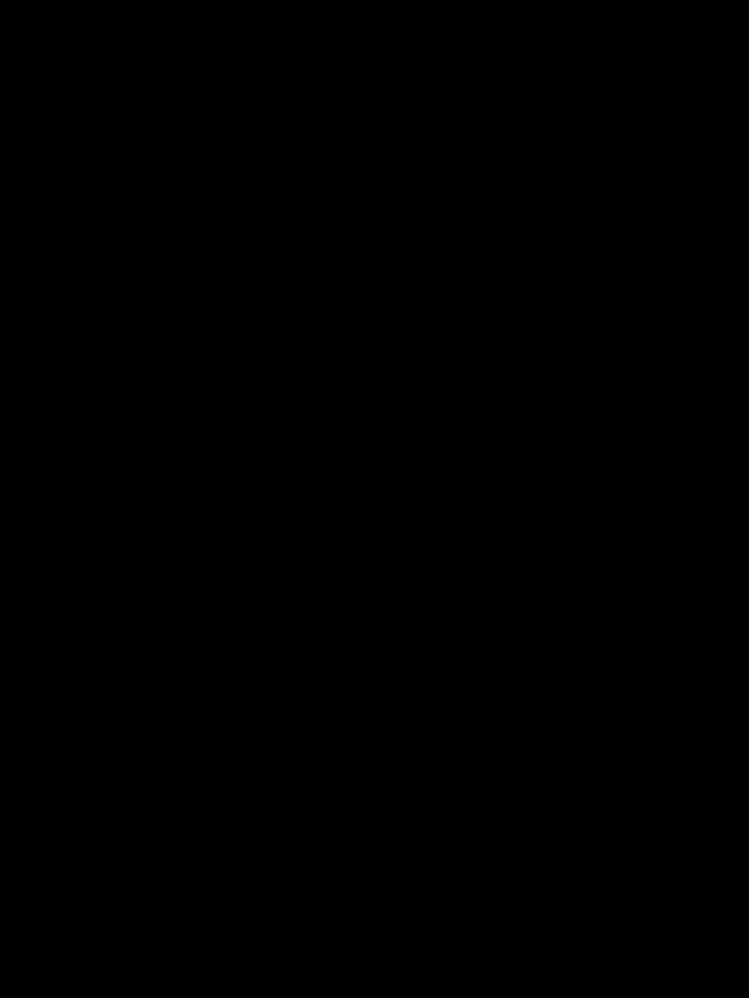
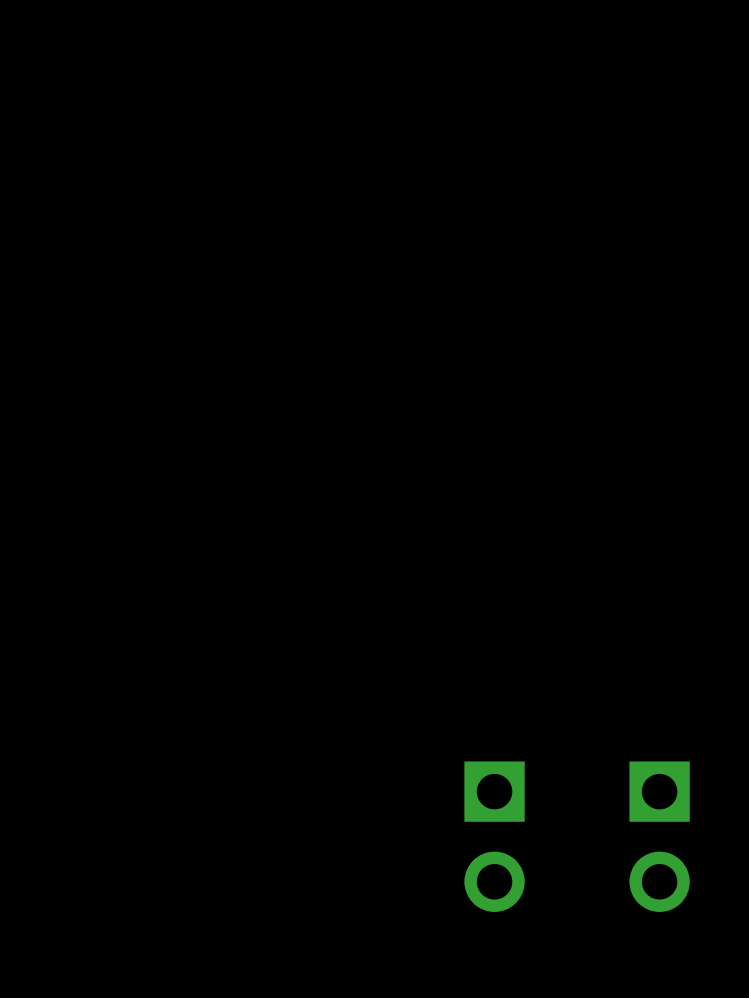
part: none -> (494, 836)
part: none -> (659, 836)

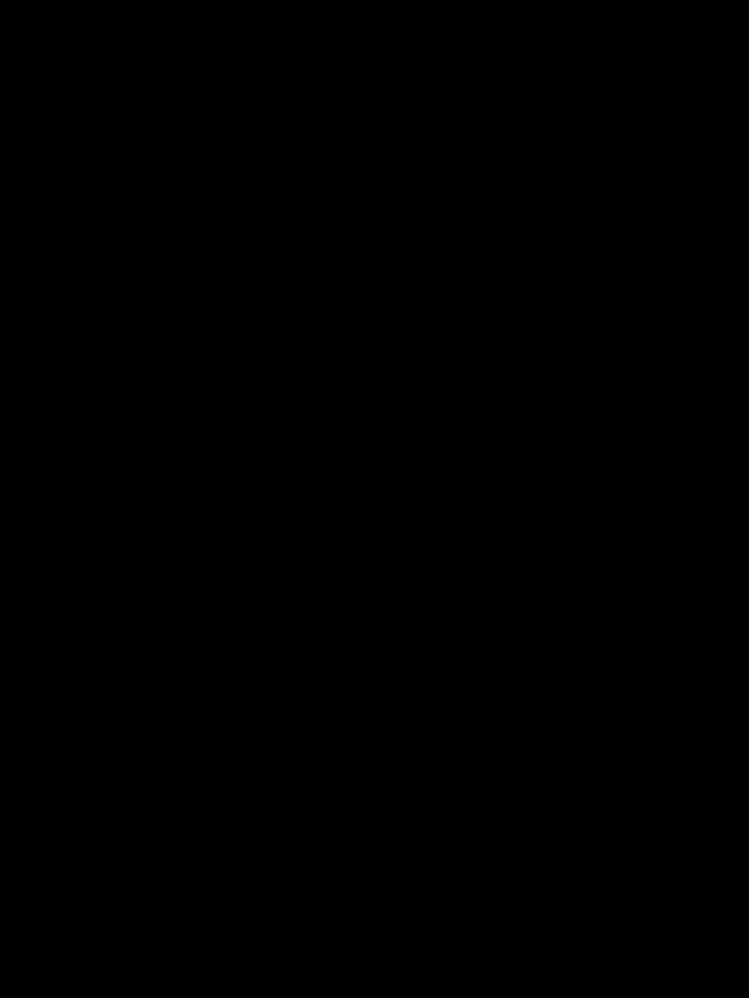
part: (494, 836) -> none
part: (659, 836) -> none

